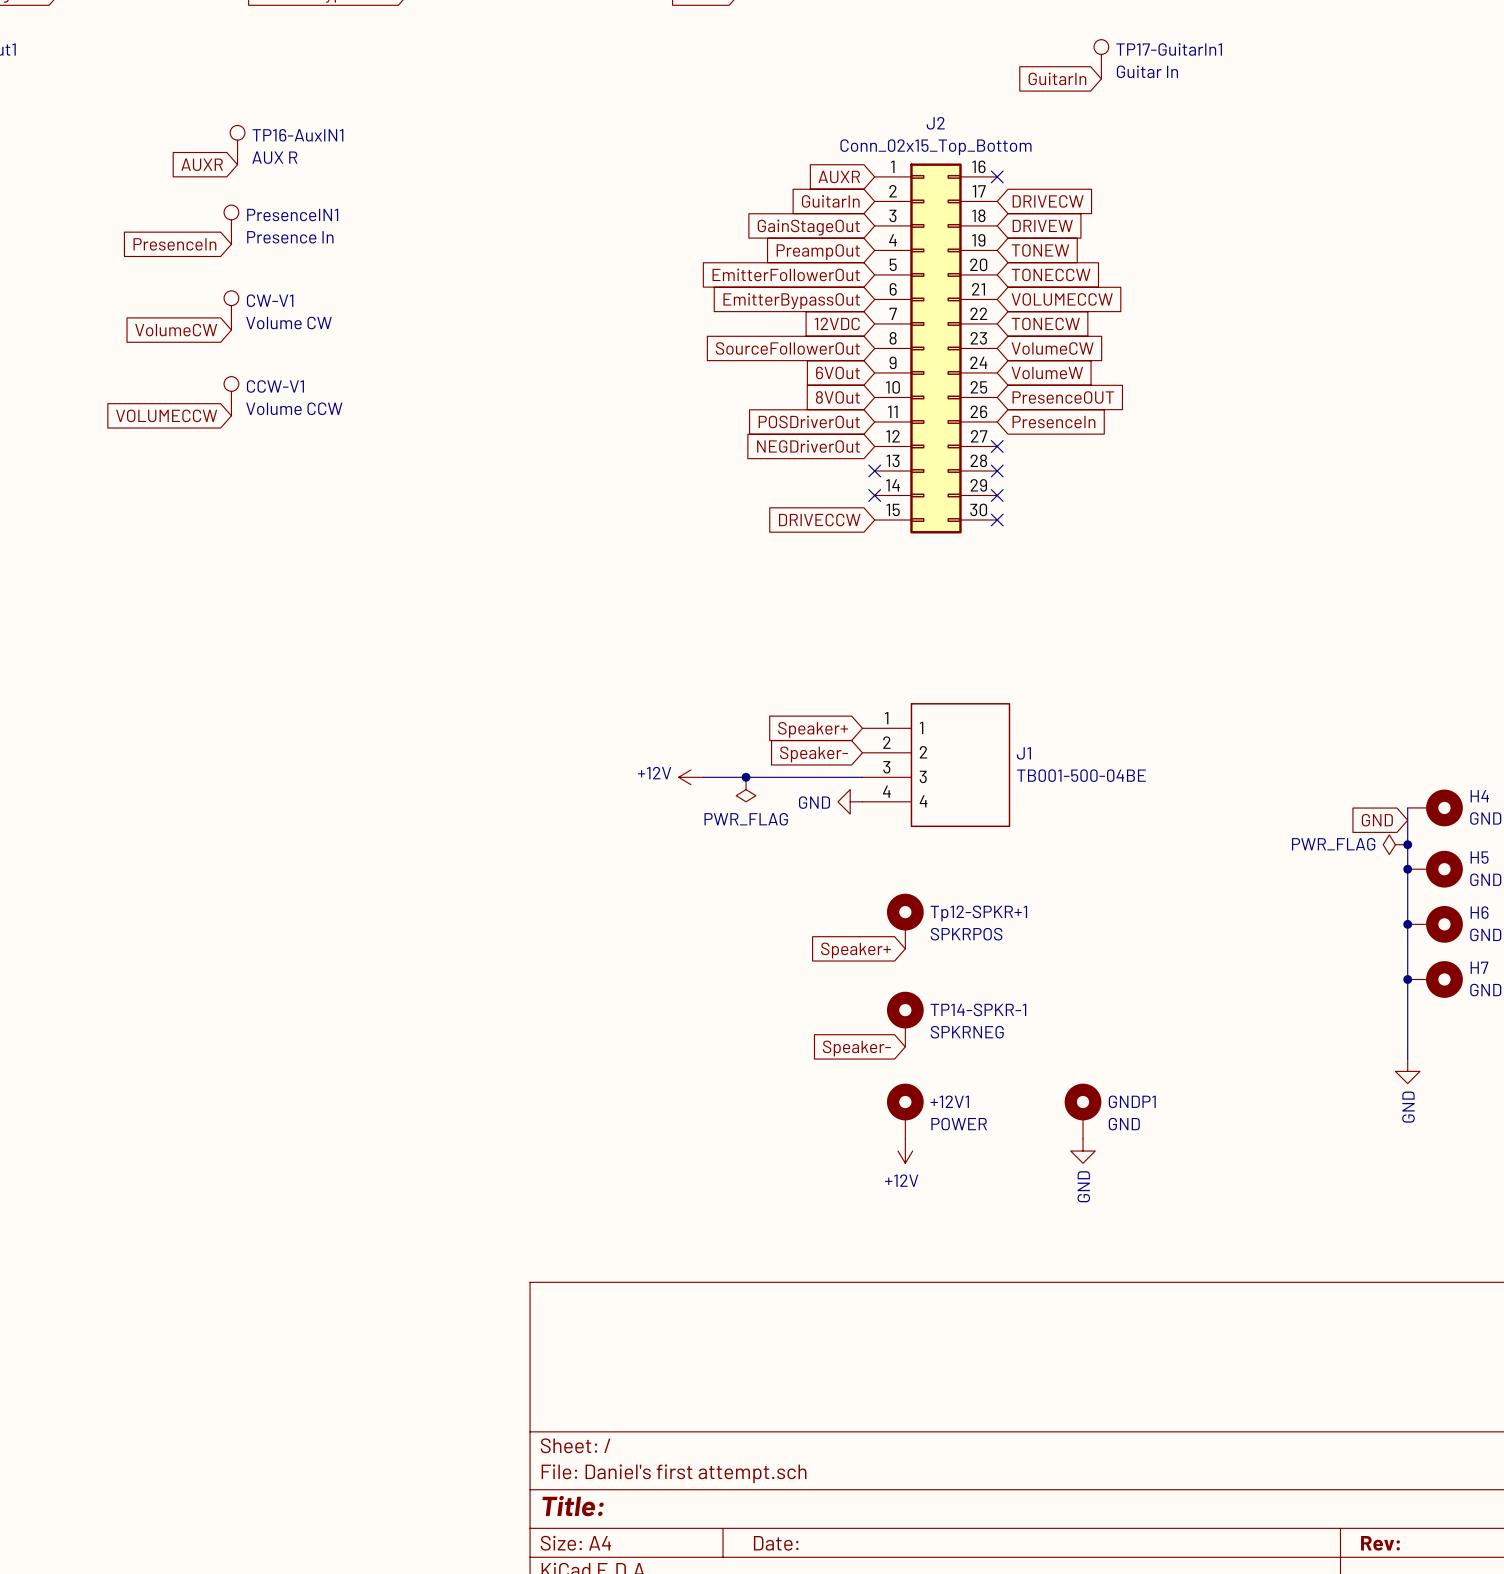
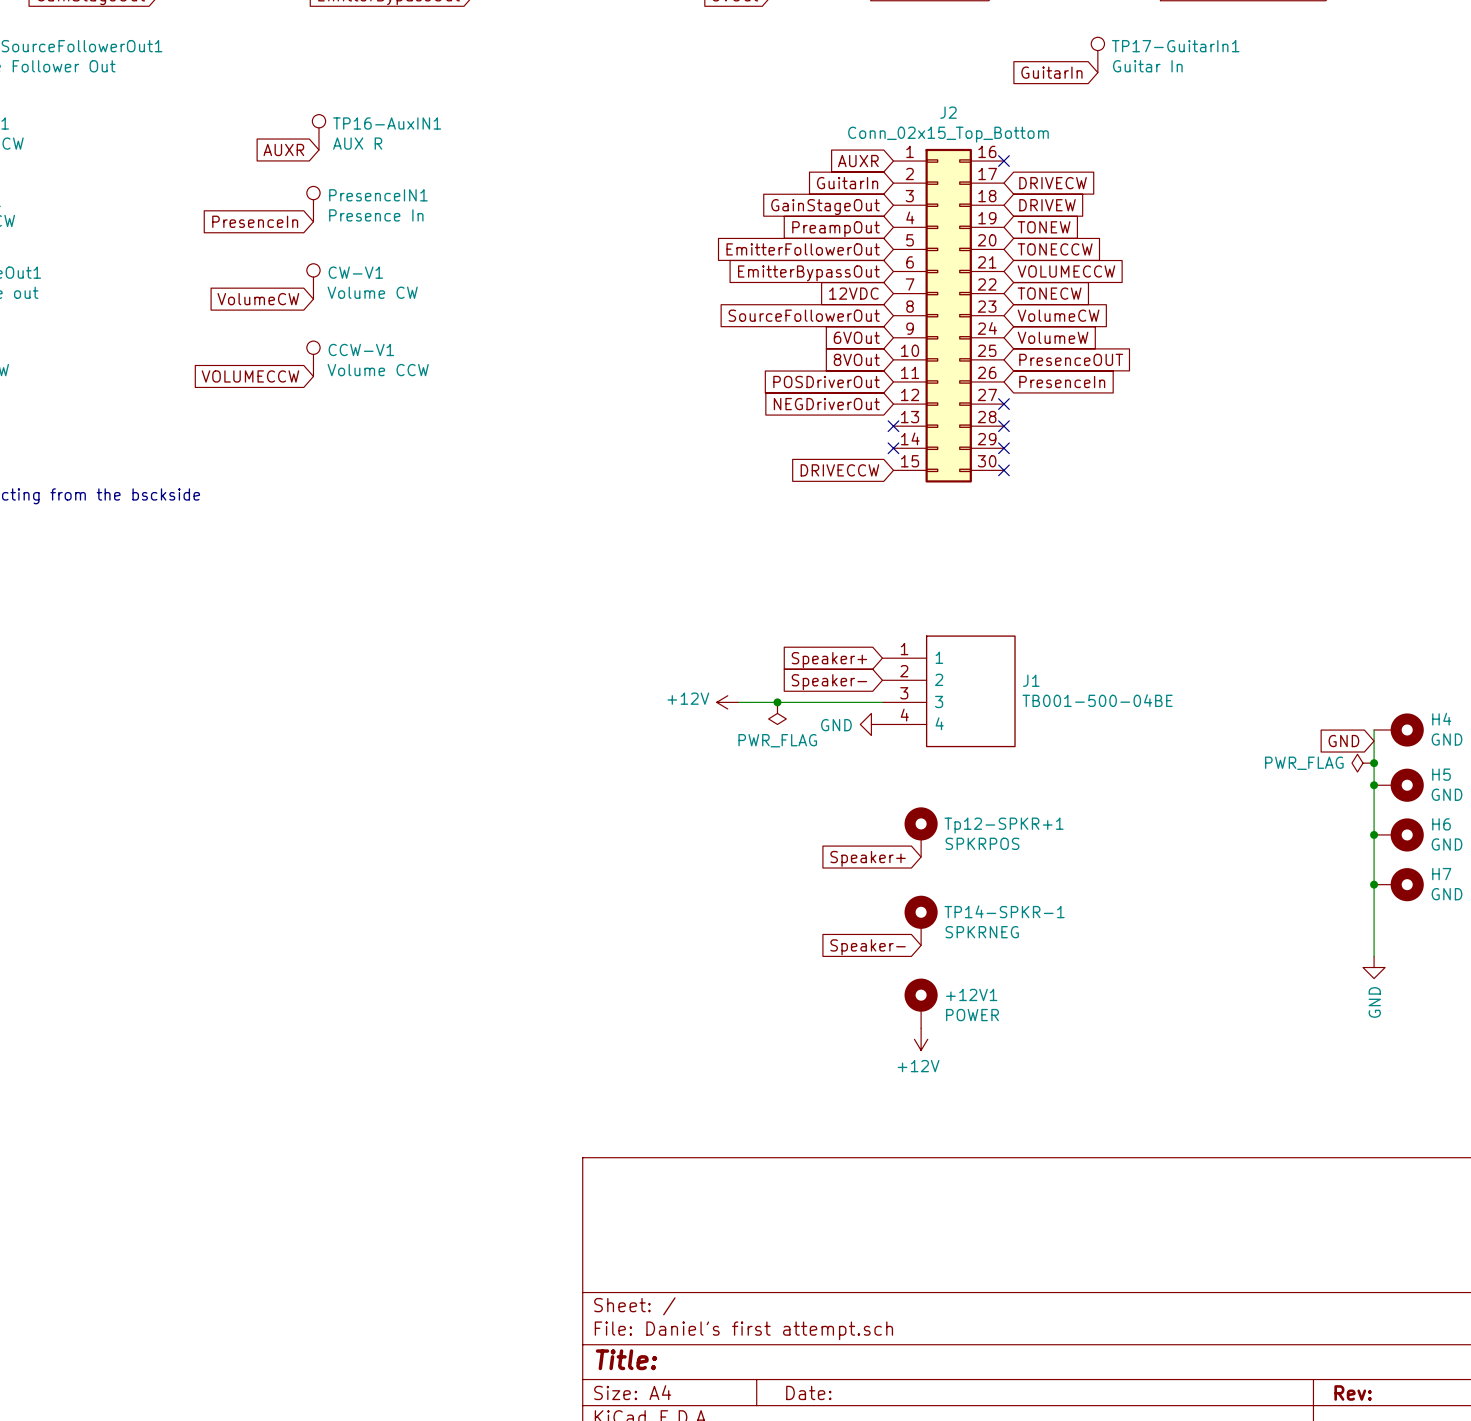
GNDP1: GND (1083, 1111) -> none
power symbol: GND (1083, 1151) -> none

